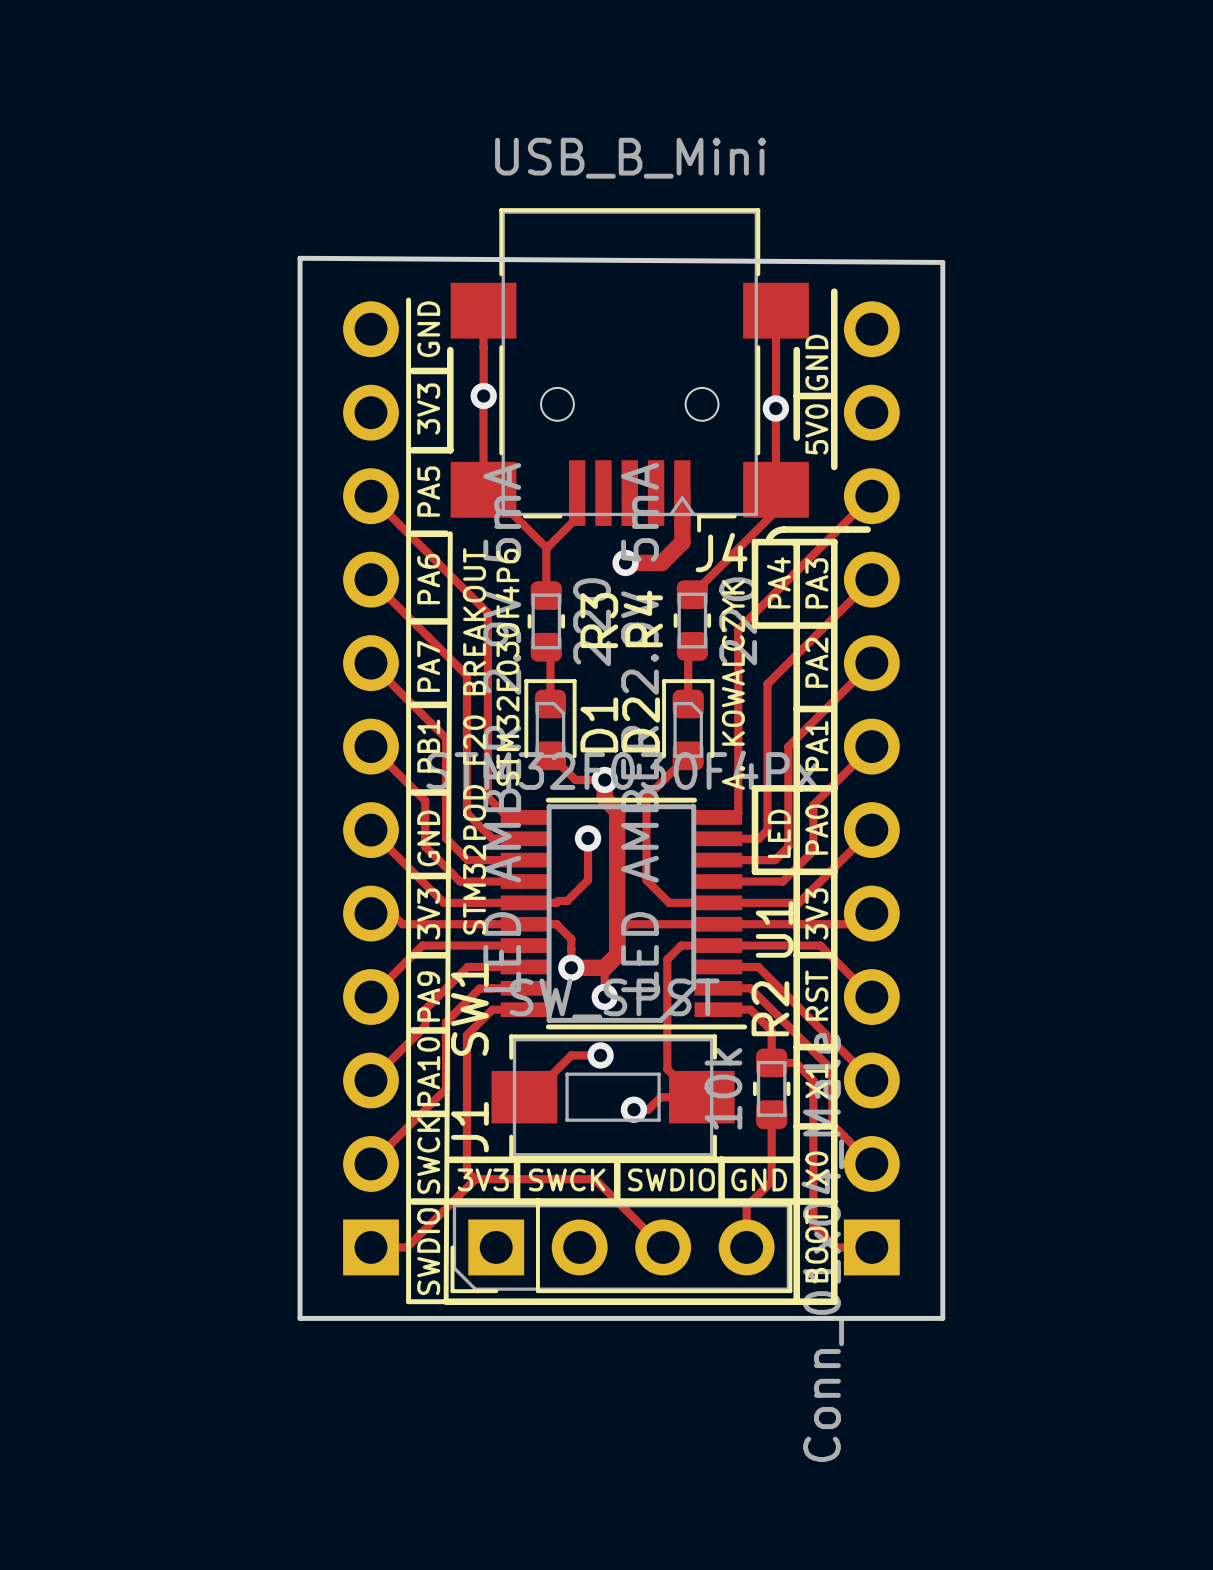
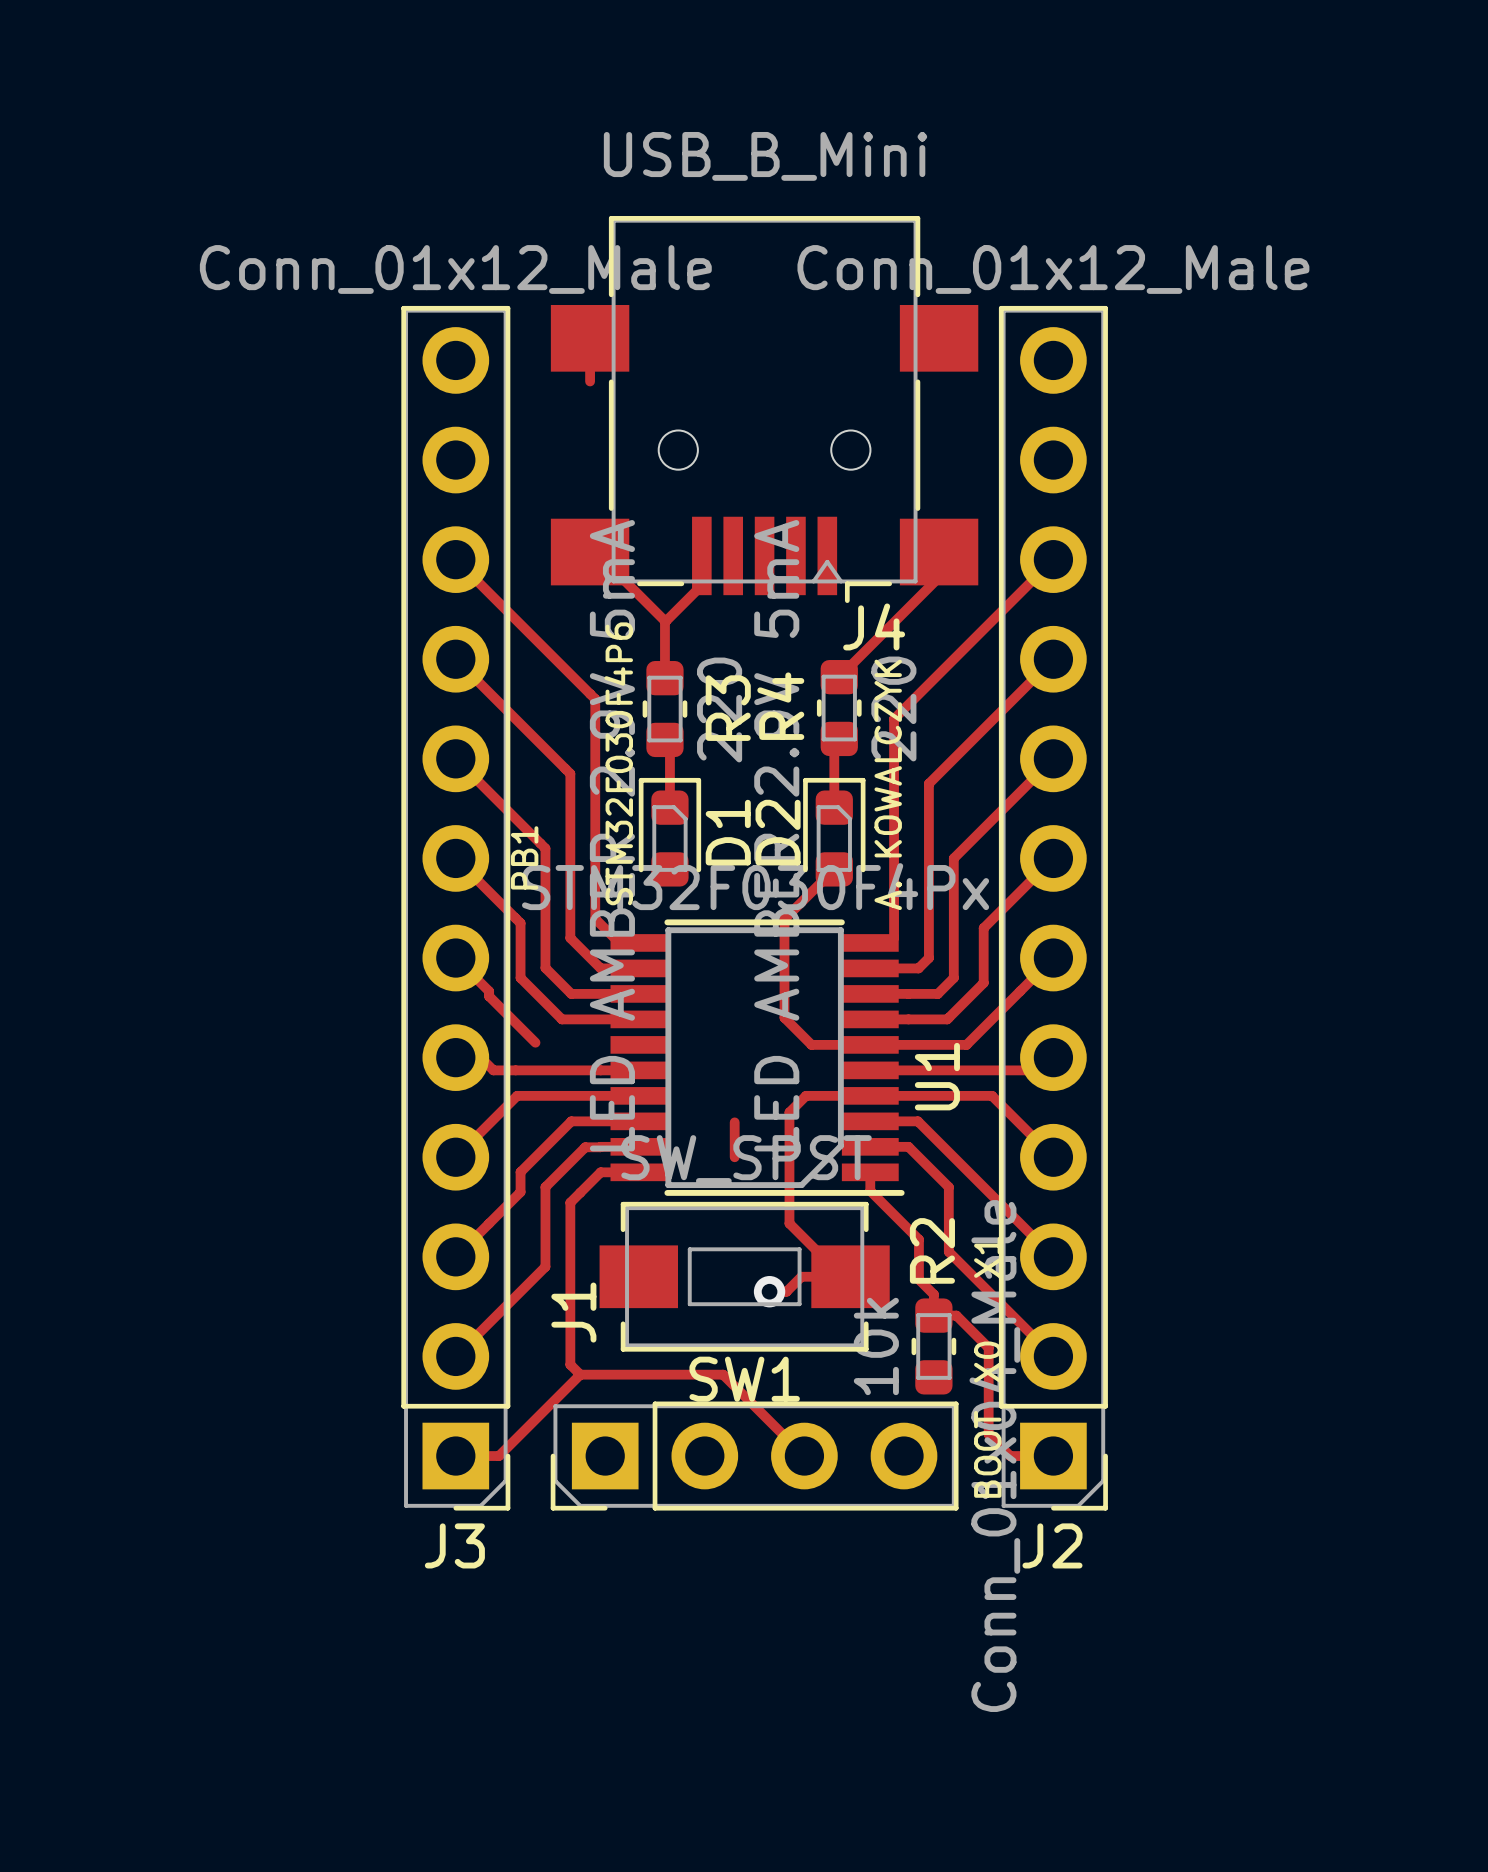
board edge: (300, 258) (300, 1318) (942, 1318) (942, 262) (300, 258) -> none
line: (834, 291) (834, 466) -> none
line: (408, 300) (408, 1301) (446, 1301) -> none
track: (776, 310) (776, 489) -> none
text: GND (428, 329) -> none
track: (483, 347) (483, 396) -> none
line: (450, 350) (450, 450) (412, 450) -> none
line: (796, 350) (796, 437) -> none
text: GND (816, 362) -> none
line: (412, 370) (446, 370) -> none
track: (483, 396) (483, 489) -> none
via: (483, 396) -> none
line: (796, 396) (830, 396) -> none
text: 3V3 (428, 408) -> none
via: (775, 408) -> none
text: 5V0 (816, 429) -> none
text: PA5 (428, 491) -> none
track: (682, 493) (682, 542) (661, 562) (625, 562) -> none
line: (867, 529) (782, 529) (775, 532) (769, 538) -> none
line: (412, 533) (446, 533) -> none
line: (450, 533) (446, 1301) -> none
line: (796, 542) (796, 1301) -> none
via: (625, 562) -> none
text: PA6 (428, 579) -> none
text: PA4 (778, 582) -> none
text: PA3 (816, 583) -> none
line: (412, 621) (446, 621) -> none
line: (830, 625) (754, 625) (754, 542) (834, 542) (834, 1301) (446, 1301) -> none
text: PA2 (816, 662) -> none
text: PA7 (428, 666) -> none
line: (412, 704) (446, 704) -> none
line: (796, 709) (830, 709) -> none
text: STM32POD F20 BREAKOUT (474, 741) -> none
text: PA1 (816, 746) -> none
track: (550, 755) (575, 779) (604, 779) (604, 798) (617, 811) (617, 955) (604, 967) -> none
via: (604, 779) -> none
J3 side: bottom (371, 788) -> top (455, 908)
line: (834, 788) (754, 788) (754, 871) (834, 871) -> none
J2 side: bottom (871, 788) -> top (1053, 908)
line: (412, 792) (446, 792) -> none
text: PA0 (816, 829) -> none
text: LED (779, 833) -> none
text: GND (428, 838) -> none
track: (588, 838) (588, 880) (567, 901) (558, 901) (556, 902) (443, 902) (398, 858) -> (535, 1042) (489, 996) (489, 991)
via: (588, 838) -> none
line: (412, 875) (446, 875) -> none
text: 3V3 (428, 914) -> none
text: 3V3 (816, 914) -> none
track: (524, 924) (556, 924) (571, 939) (571, 967) (604, 967) -> none
track: (718, 924) (627, 924) (621, 930) (621, 951) (604, 967) -> none
track: (681, 945) (667, 959) (667, 1069) -> (825, 1095) (806, 1095) (789, 1112) (789, 1223) (809, 1243)
line: (412, 955) (446, 955) -> none
line: (796, 955) (830, 955) -> none
via: (571, 967) -> none
text: RST (816, 995) -> none
text: PA9 (428, 996) -> none
via: (604, 997) -> none
SW1 name rotation: 0° (469, 1009) -> 90° clockwise (744, 1379)
SW1 name position: SW1 (469, 1009) -> SW1 (744, 1379)
track: (718, 1009) (750, 1009) (771, 1030) (771, 1062) (795, 1062) (813, 1080) (813, 1225) (817, 1229) -> (870, 1172) (870, 1190) (918, 1239) (918, 1279) (933, 1294) (933, 1297)
track: (784, 1022) (832, 1070) (832, 1124) -> (948, 1187) (948, 1251) (1006, 1309)
line: (412, 1030) (446, 1030) -> none
line: (796, 1047) (834, 1047) -> none
track: (600, 1055) (571, 1055) (529, 1097) (524, 1097) -> none
via: (600, 1055) -> none
text: PA10 (428, 1071) -> none
R2 position: (771, 1088) -> (933, 1346)
line: (412, 1113) (446, 1113) -> none
line: (796, 1126) (834, 1126) -> none
track: (771, 1129) (771, 1181) (746, 1206) (746, 1247) -> (933, 1315) (956, 1315) (988, 1347) (988, 1434)
text: SWCK (428, 1155) -> none
line: (450, 1159) (796, 1159) -> none
line: (721, 1159) (721, 1201) -> none
line: (517, 1163) (517, 1197) -> none
line: (617, 1163) (617, 1197) -> none
text: 3V3 (483, 1179) -> none
text: SWCK (567, 1179) -> none
text: SWDIO (671, 1179) -> none
text: GND (759, 1179) -> none
line: (412, 1201) (446, 1201) -> none
line: (450, 1201) (834, 1201) -> none
text: SWDIO (428, 1251) -> none

